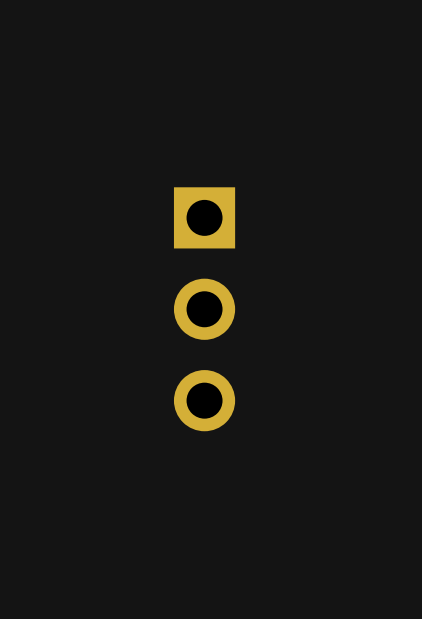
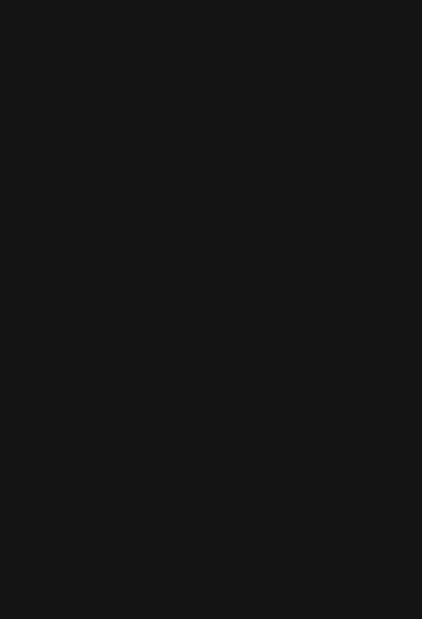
part: (204, 309) -> none

